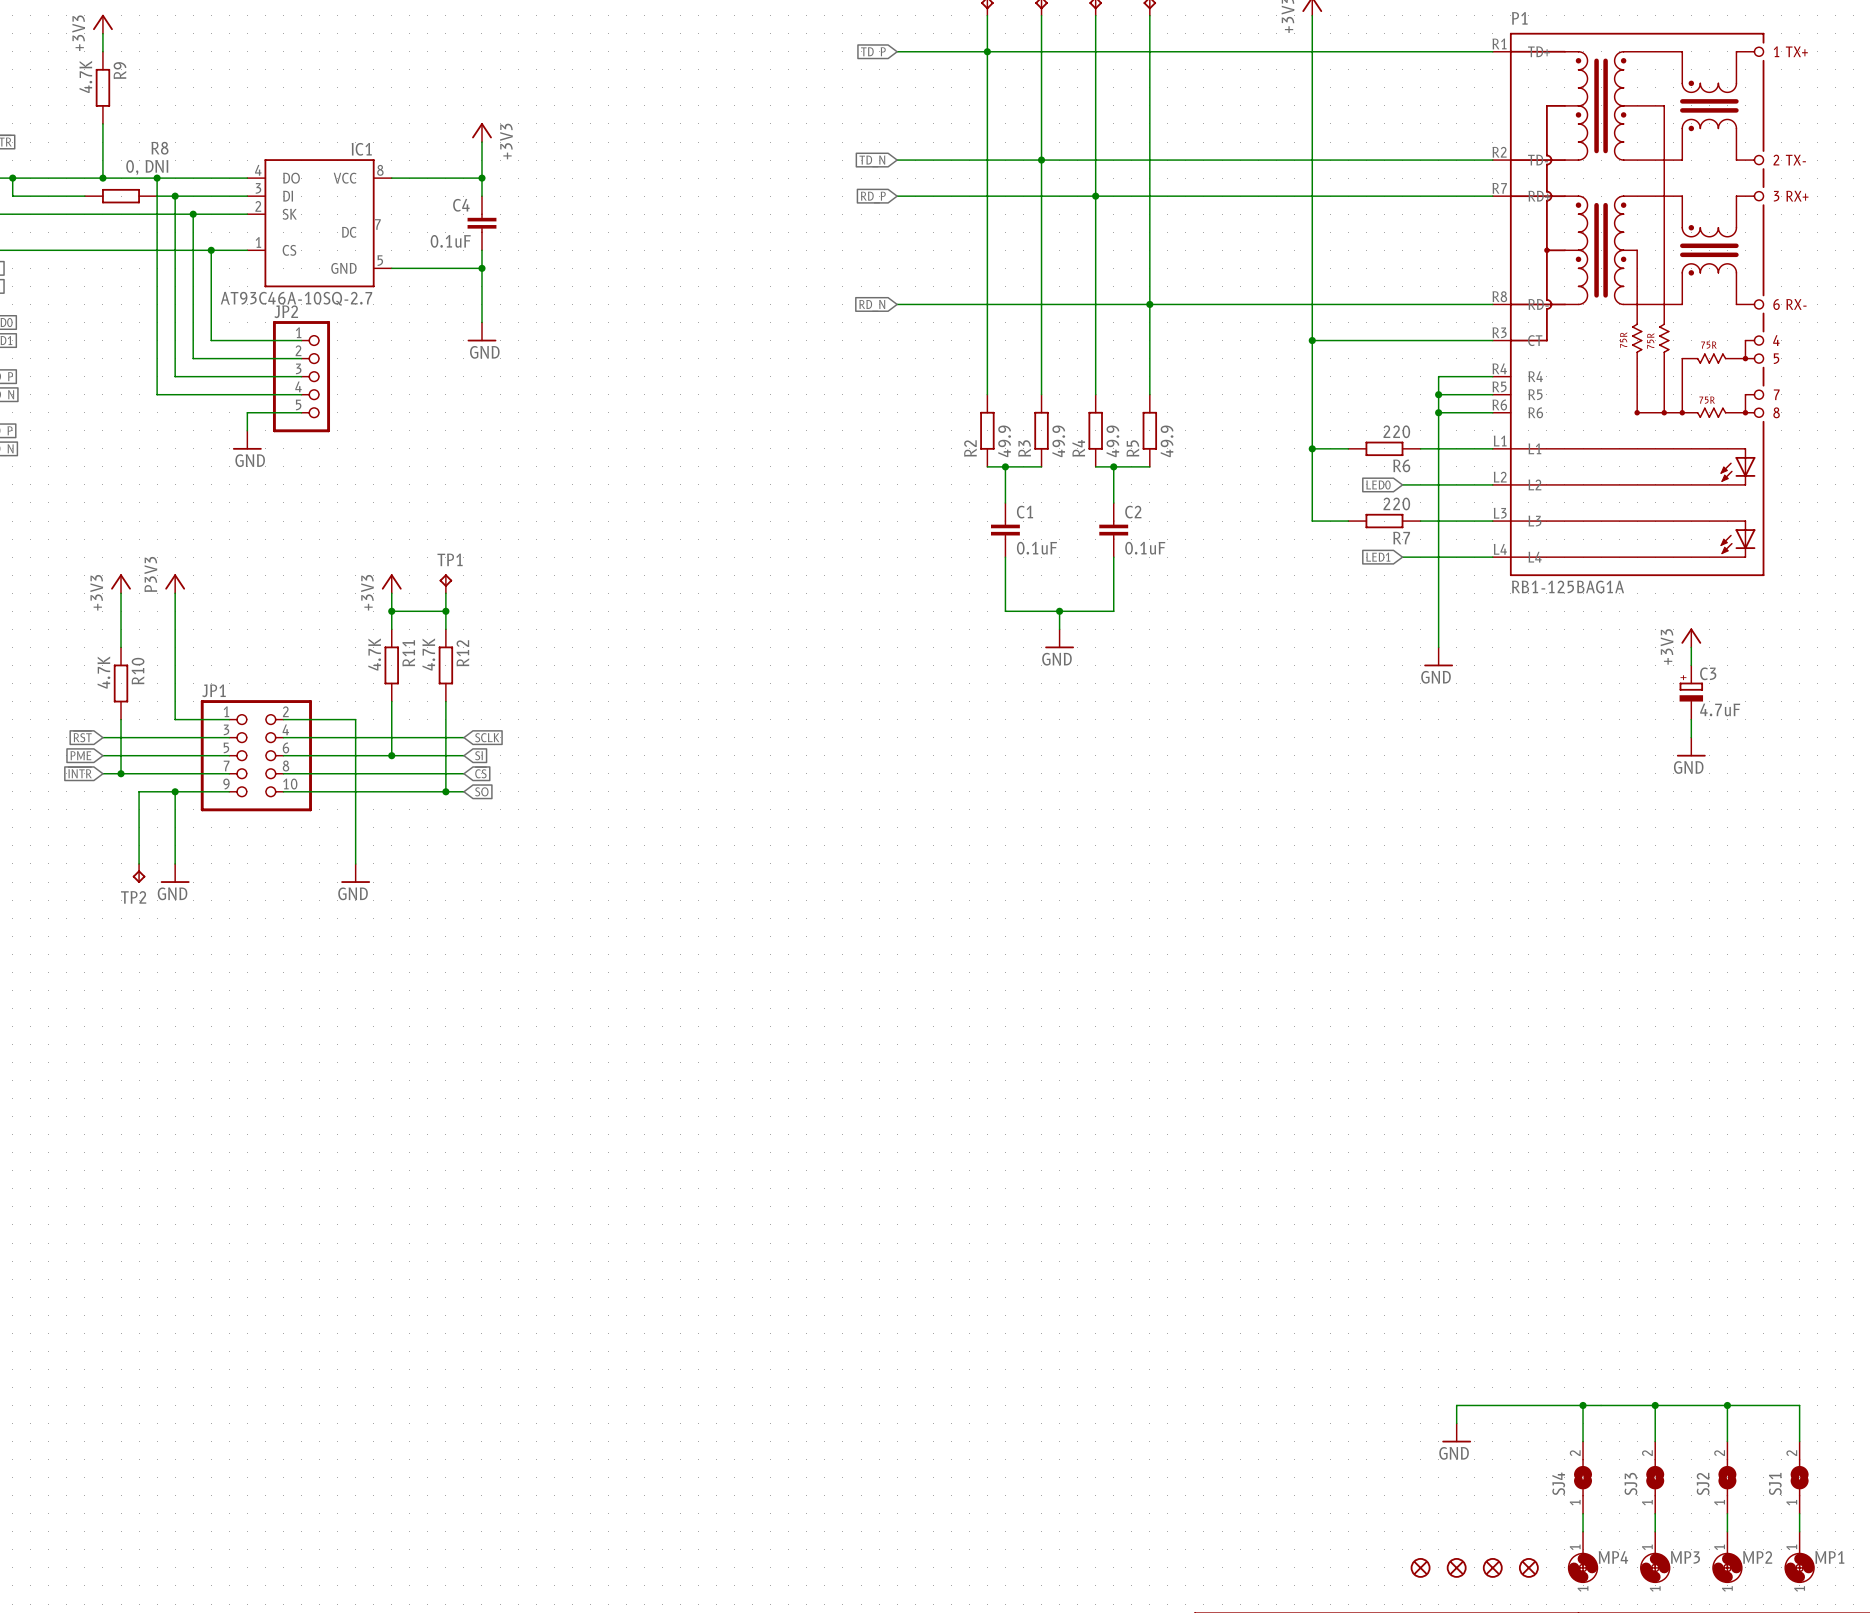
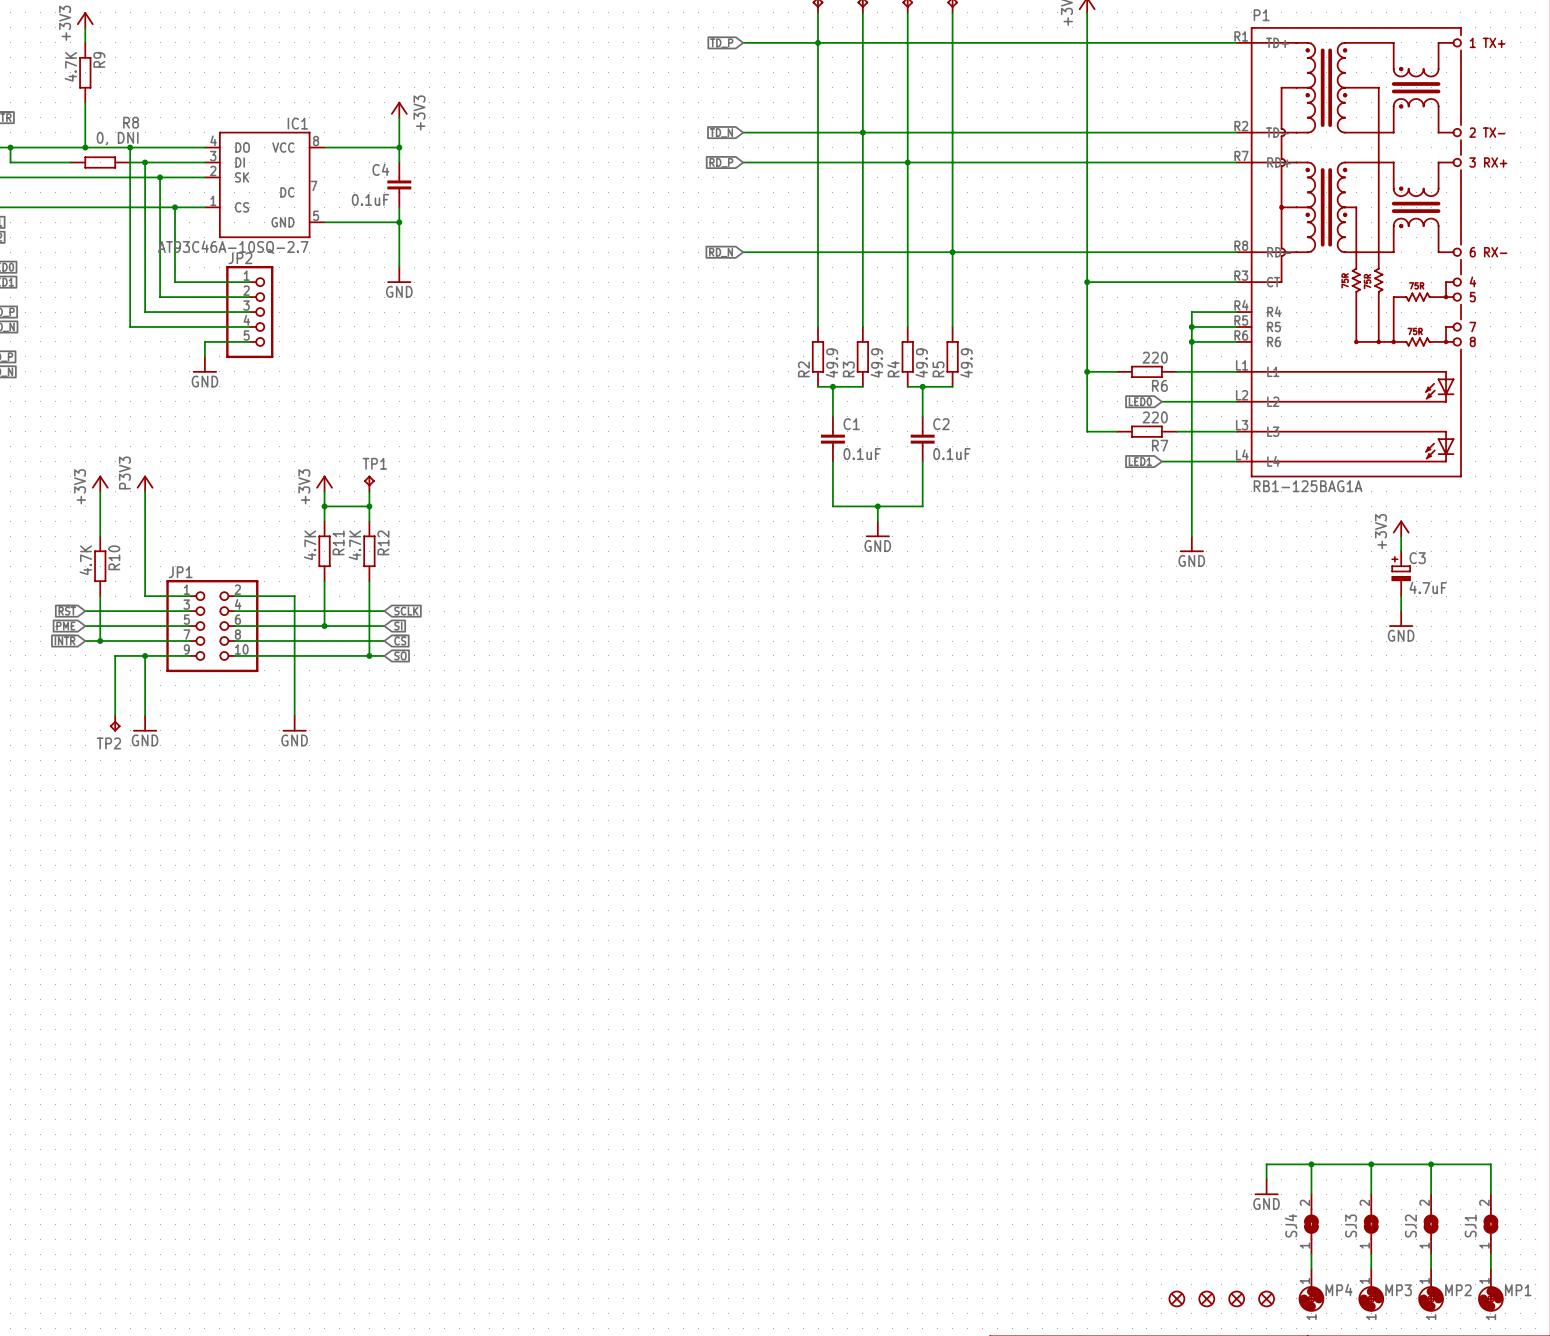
wire: (1528, 1405) (1456, 1405) (1456, 1423) -> (1266, 1164) (1266, 1179)
power symbol position: GND (1456, 1433) -> GND (1266, 1187)

